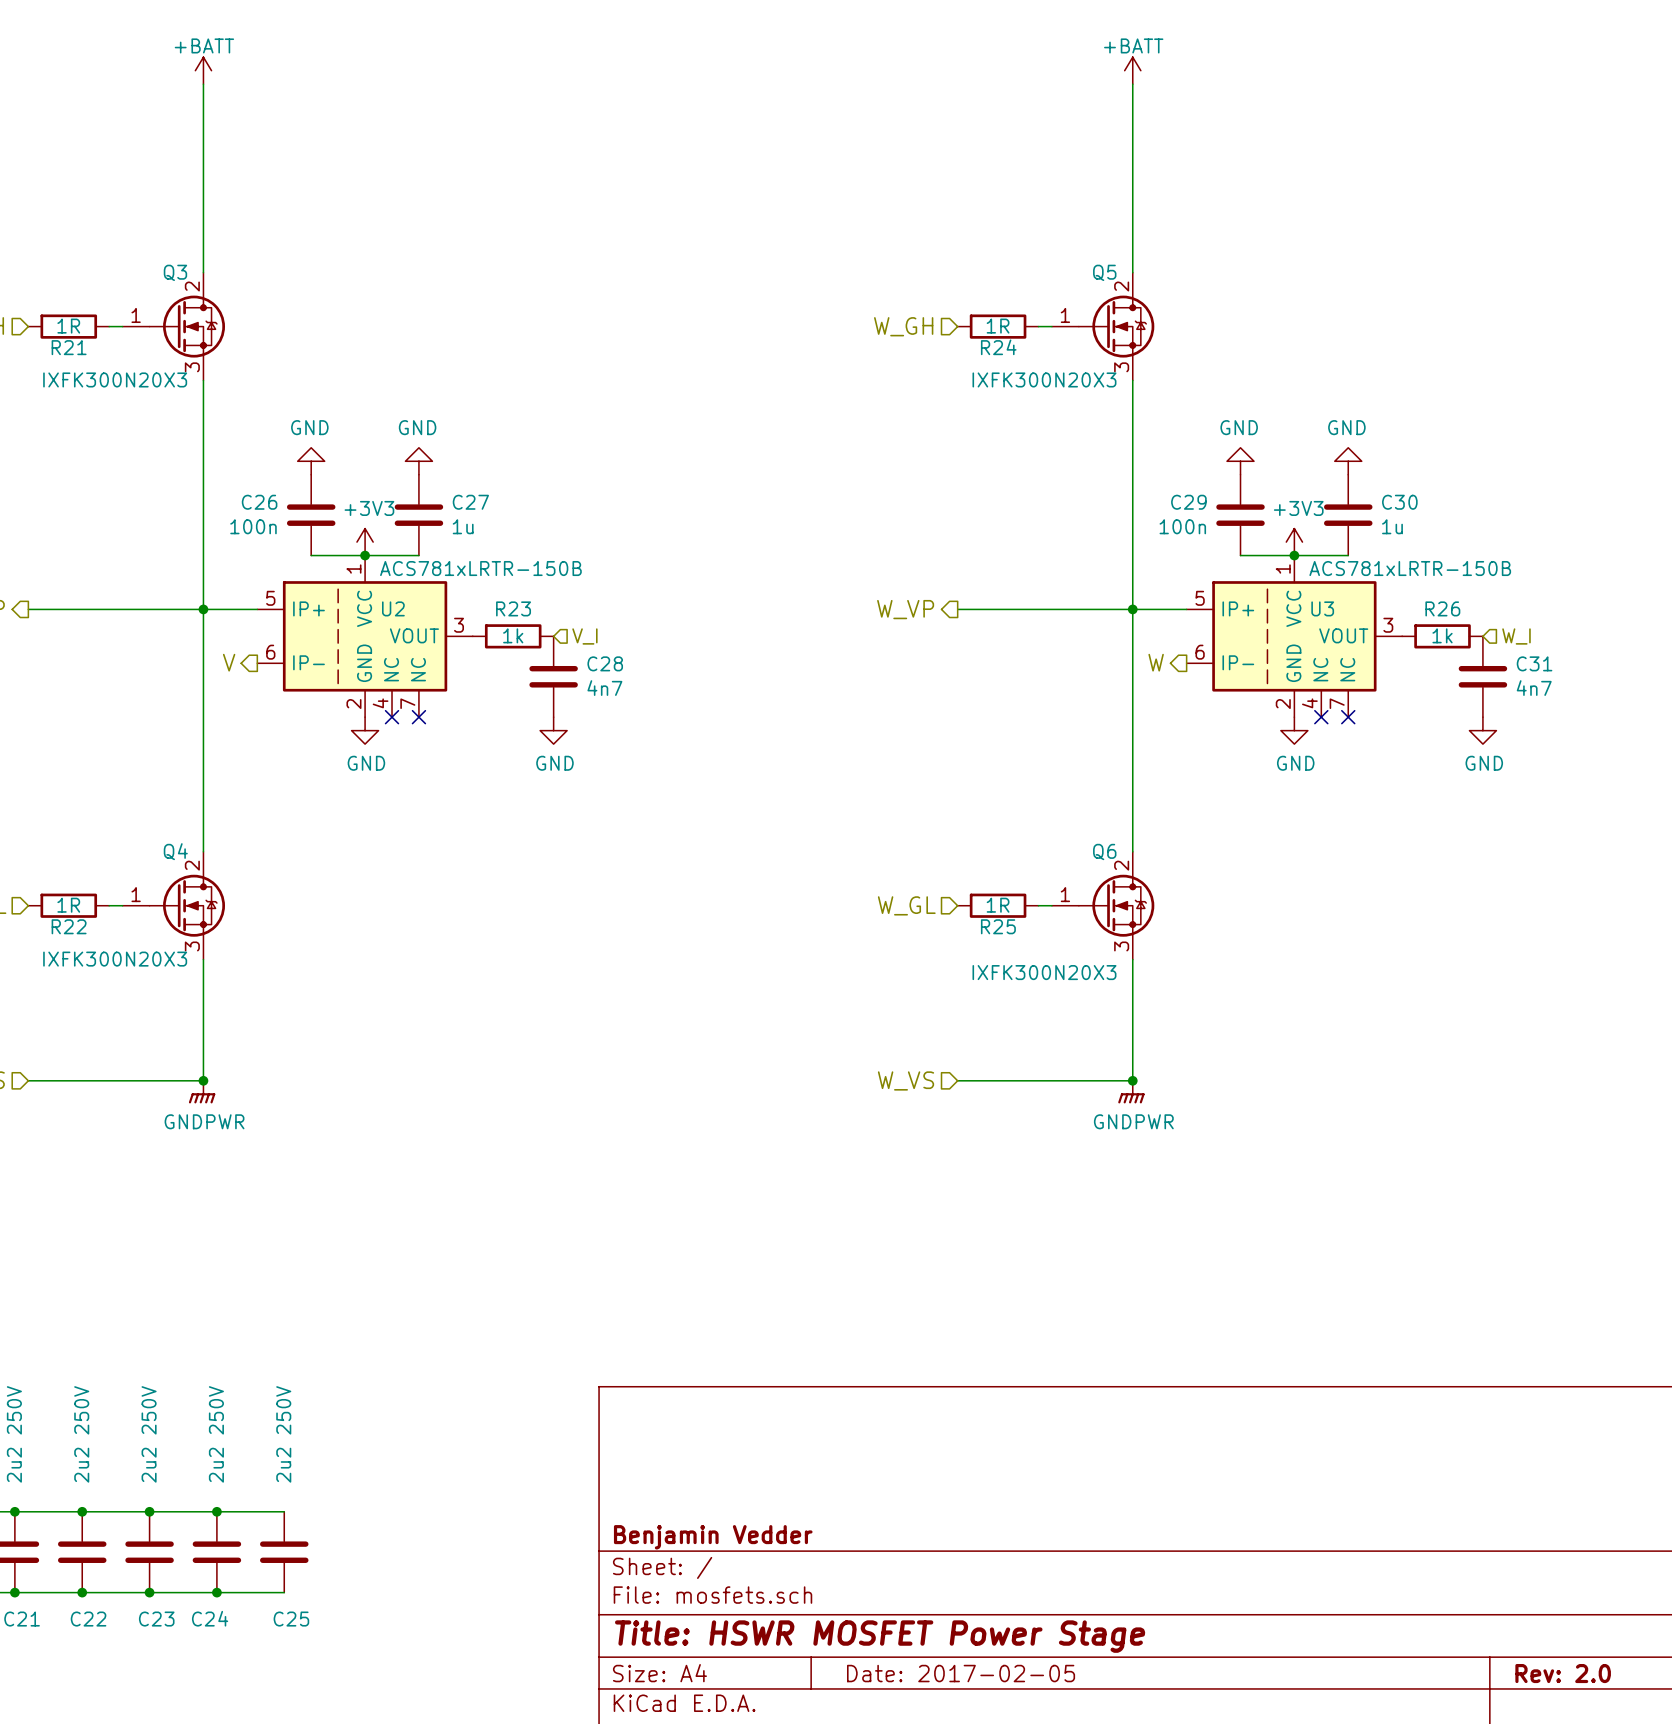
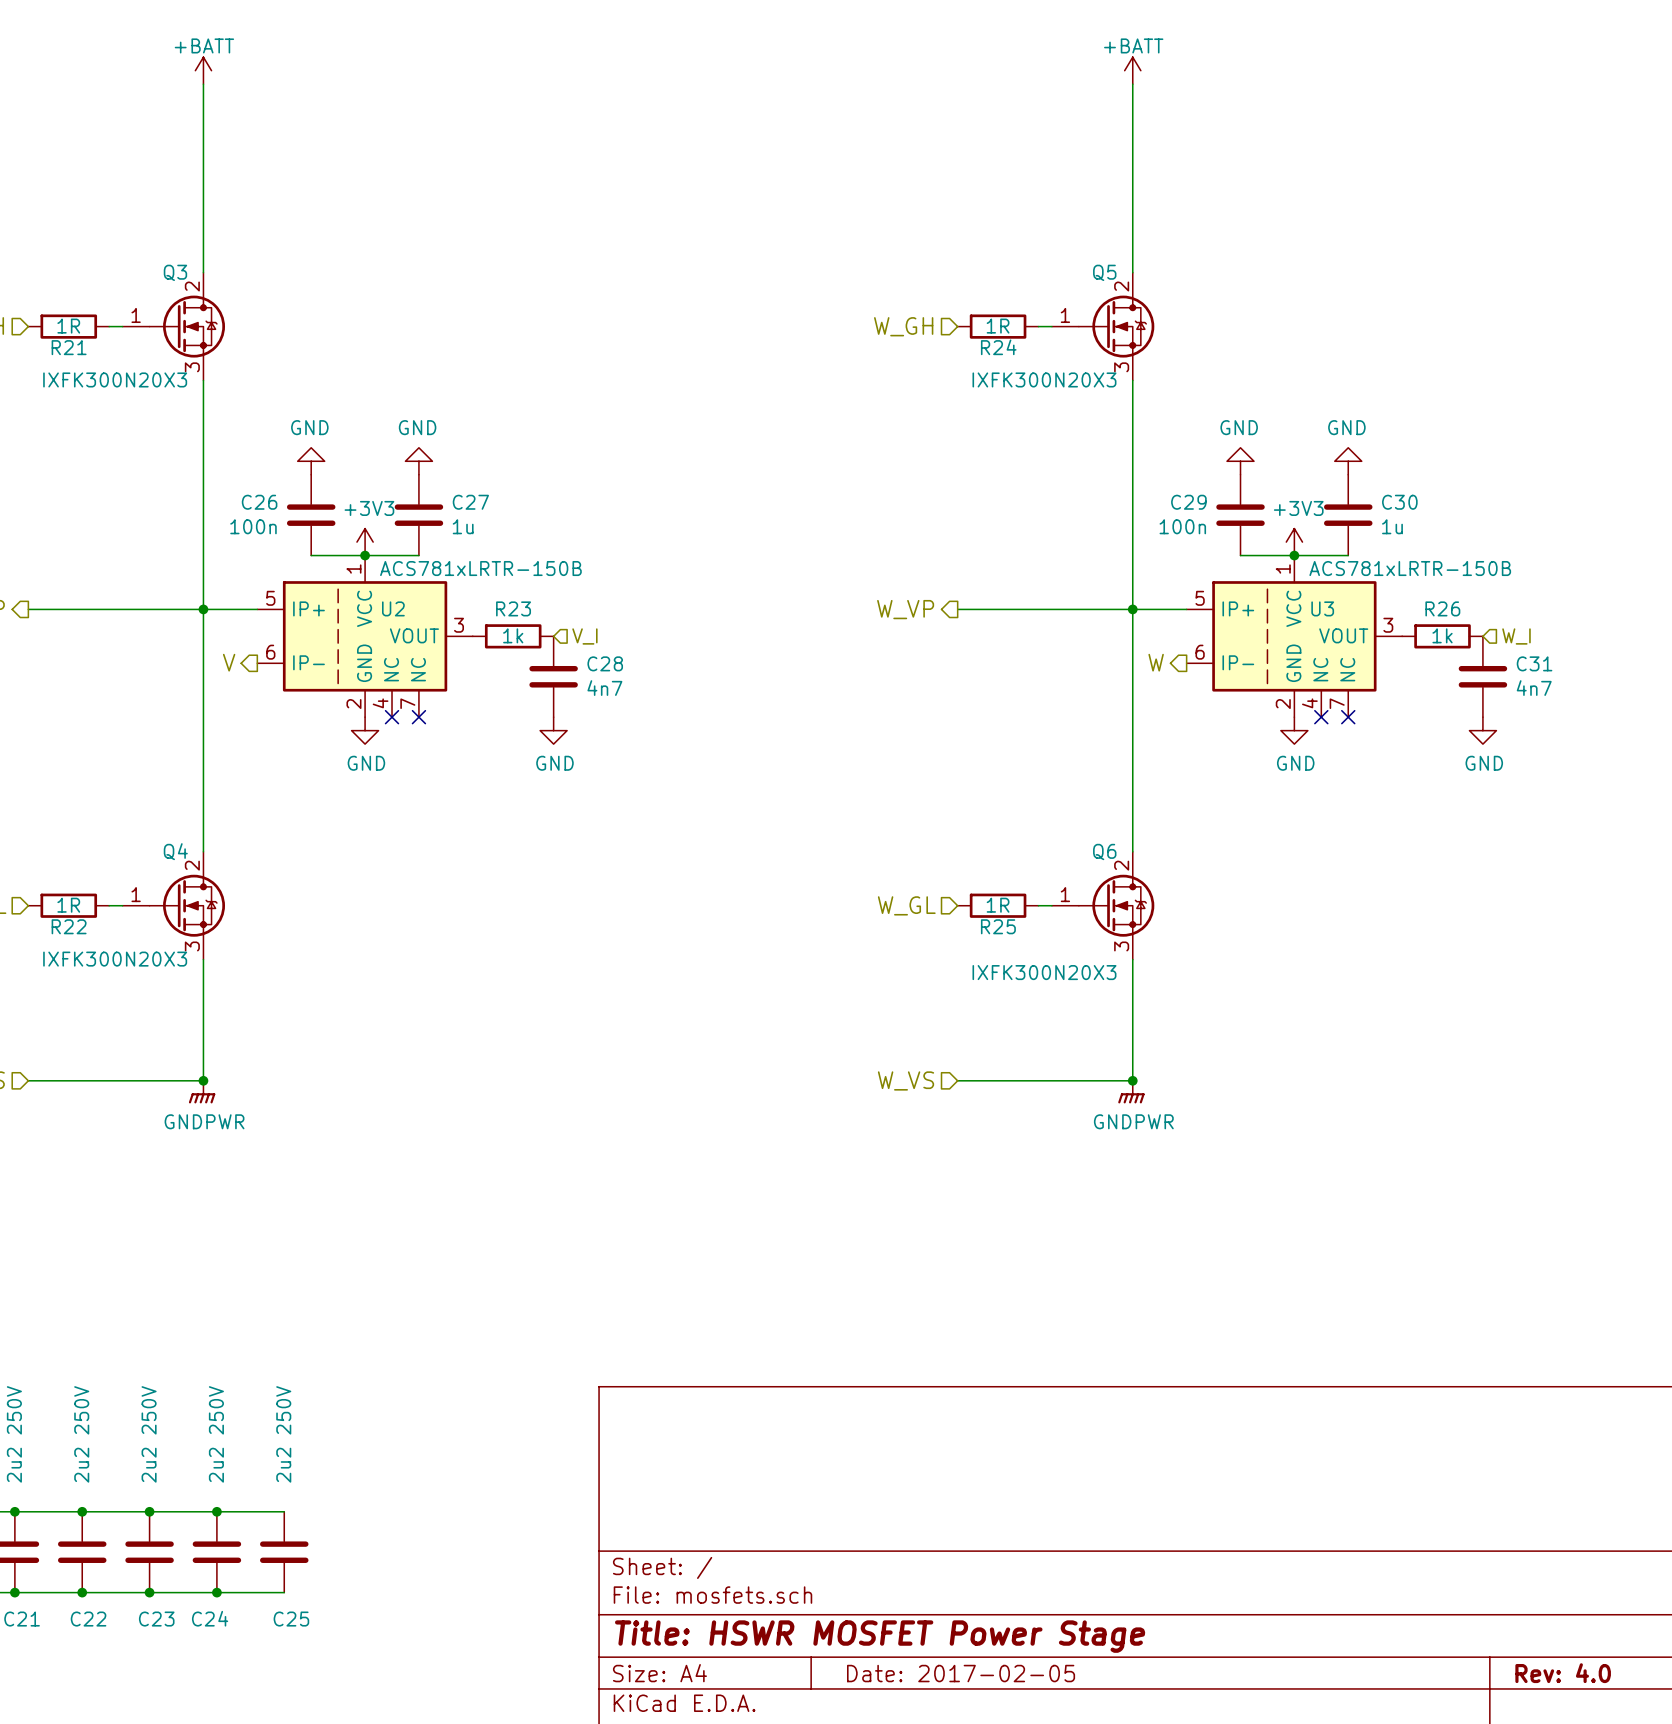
title block: Benjamin Vedder (713, 1537) -> none
title block: Rev: 2.0 (1563, 1673) -> Rev: 4.0 (1563, 1673)

